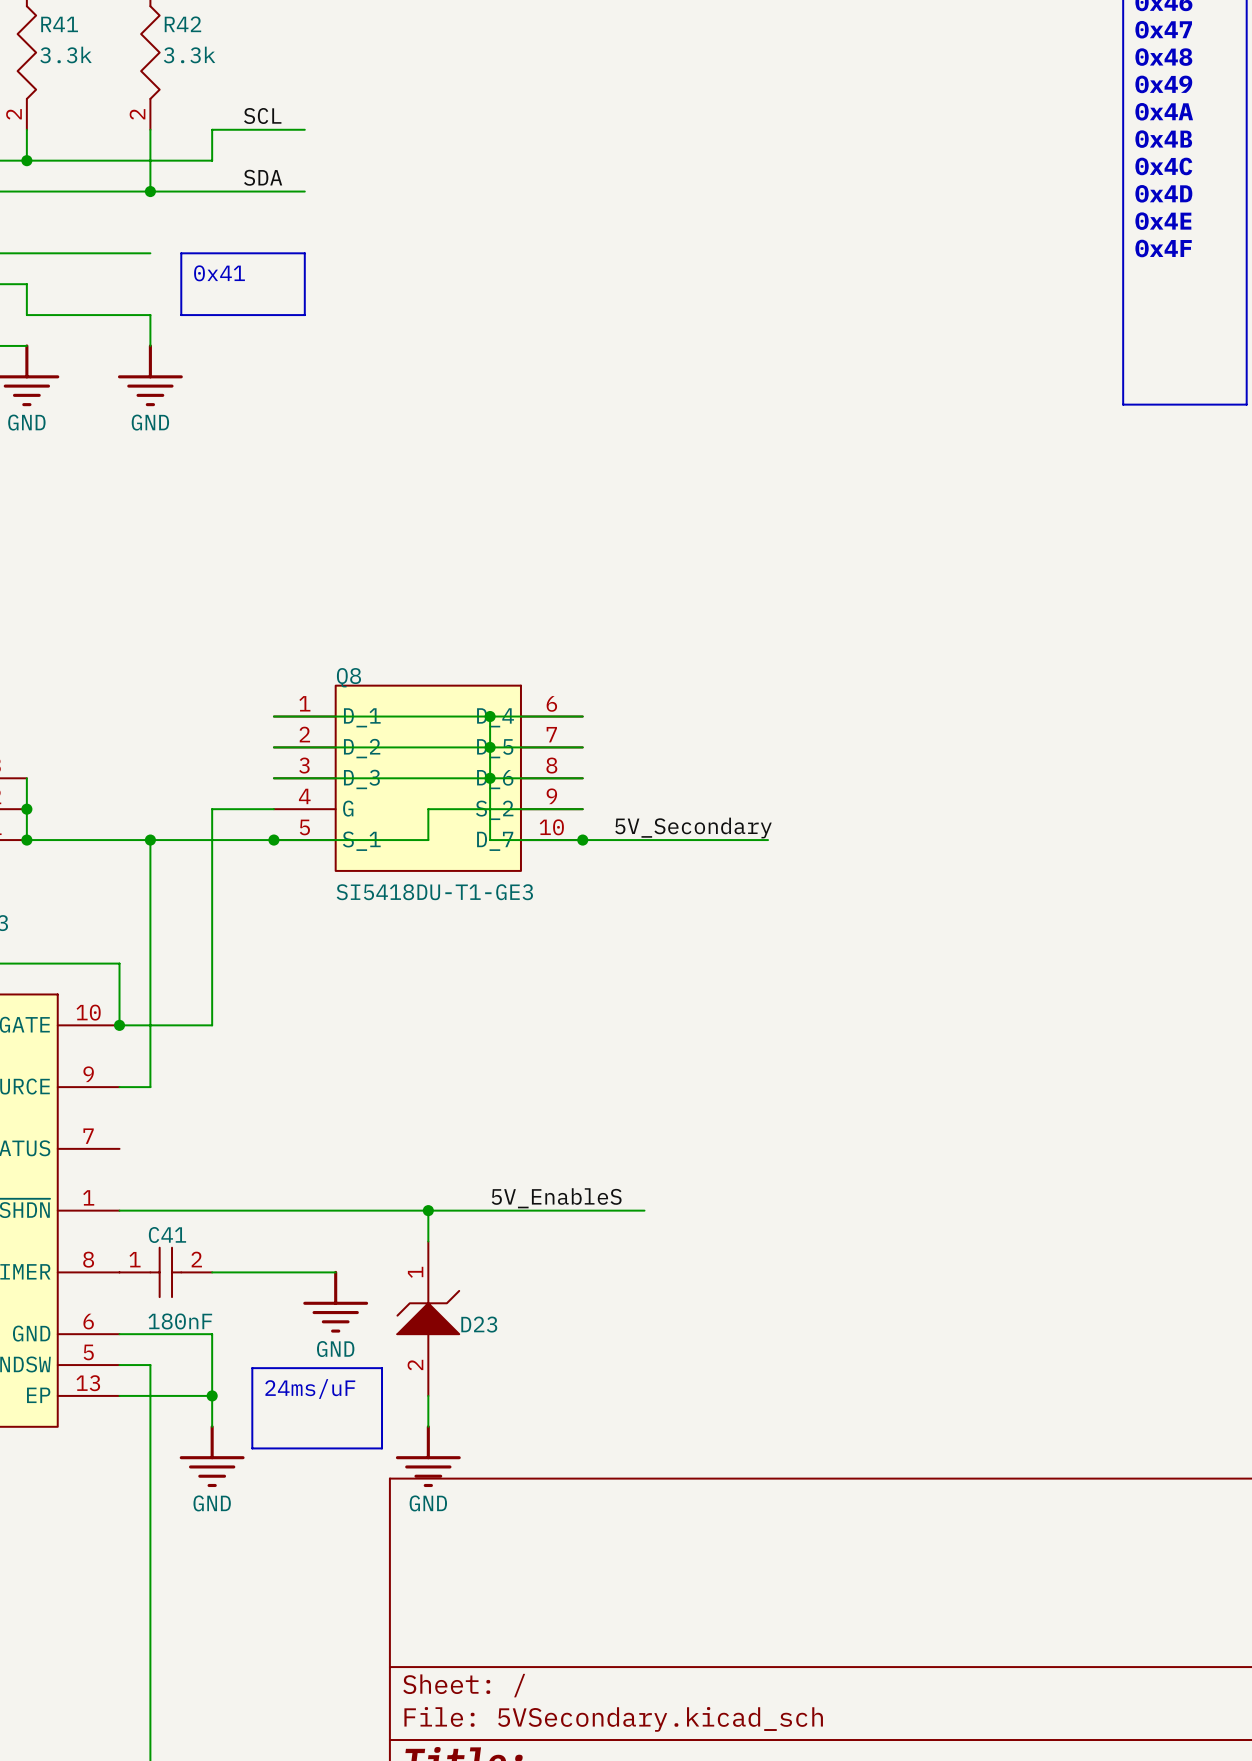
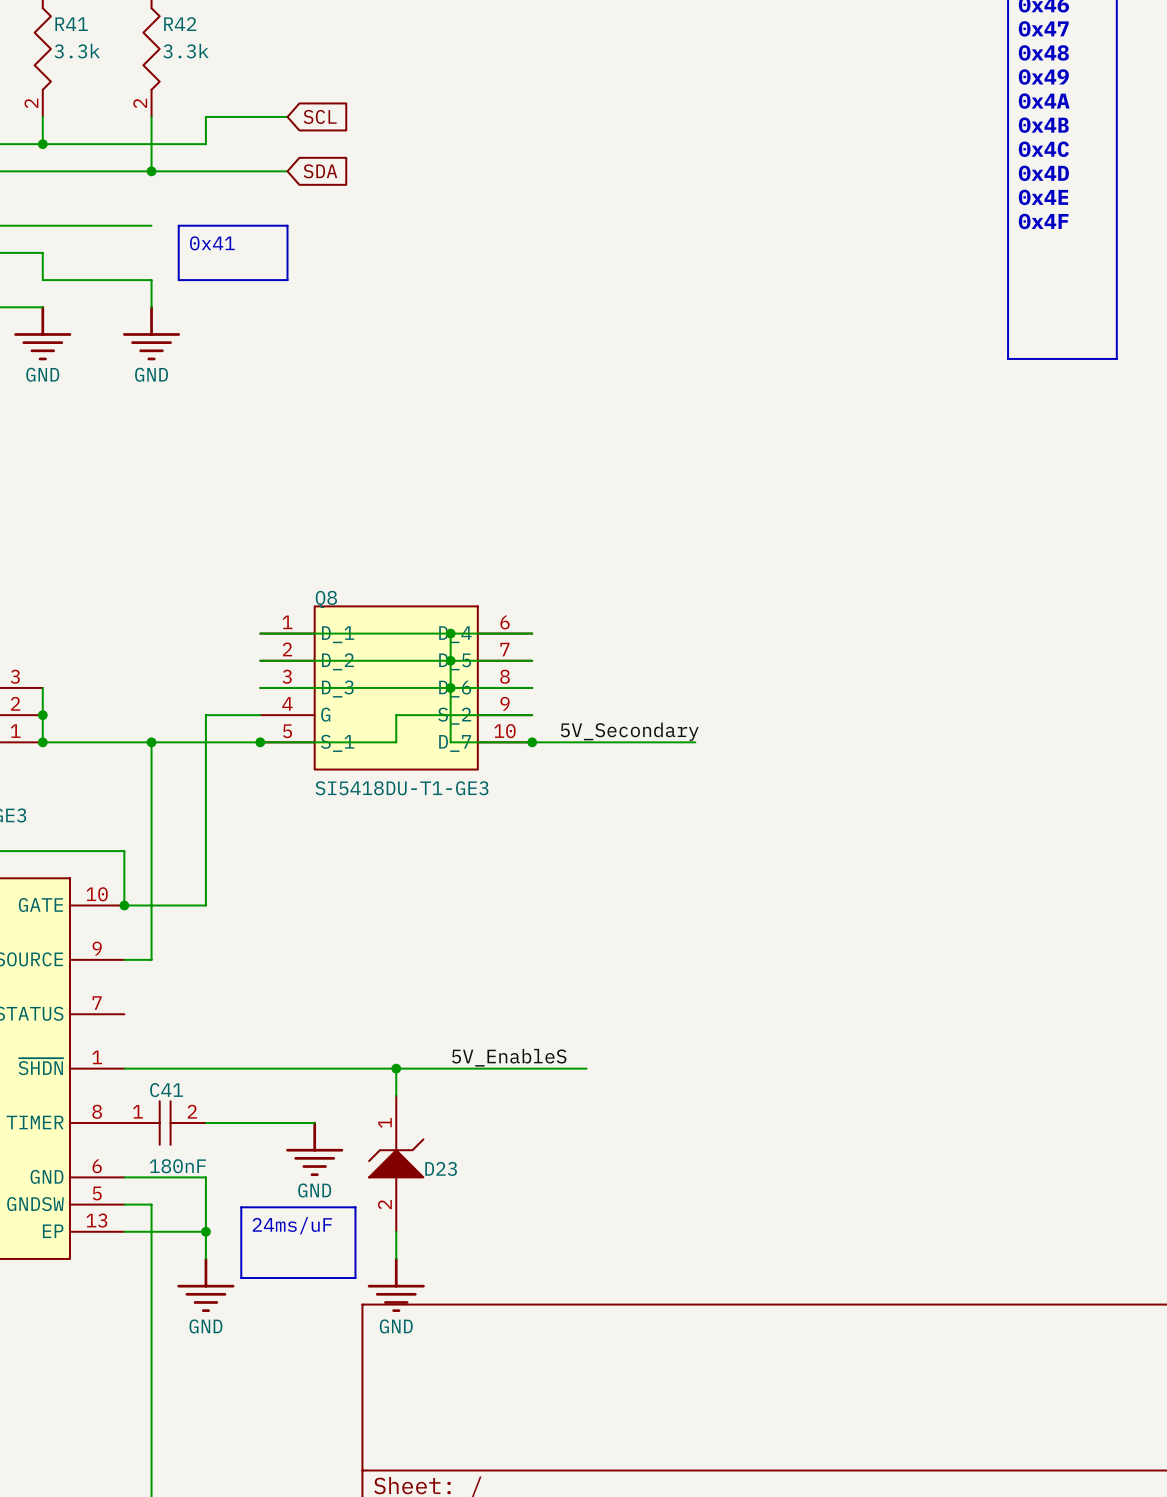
label: SCL (262, 116) -> none
global label: none -> SCL (320, 116)
label: SDA (263, 177) -> none
global label: none -> SDA (320, 171)

